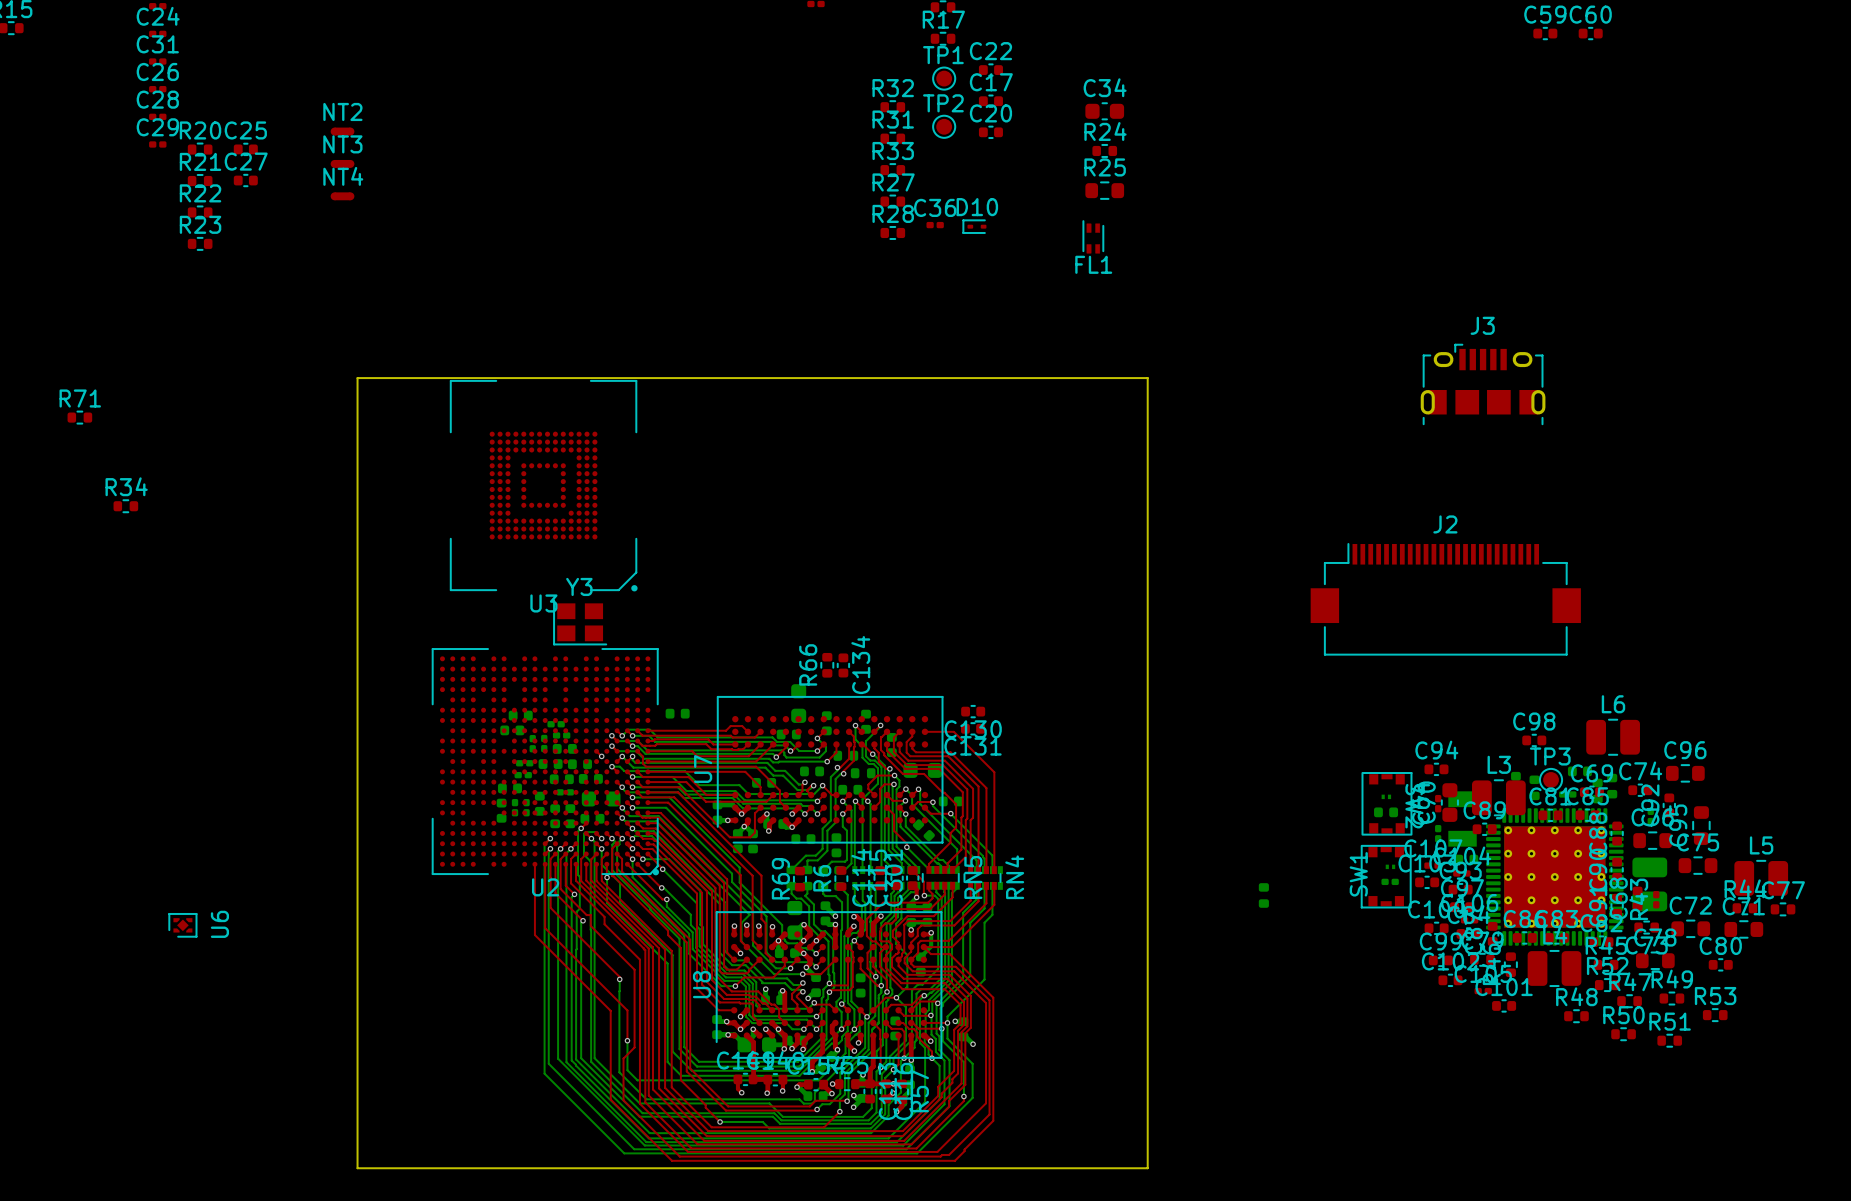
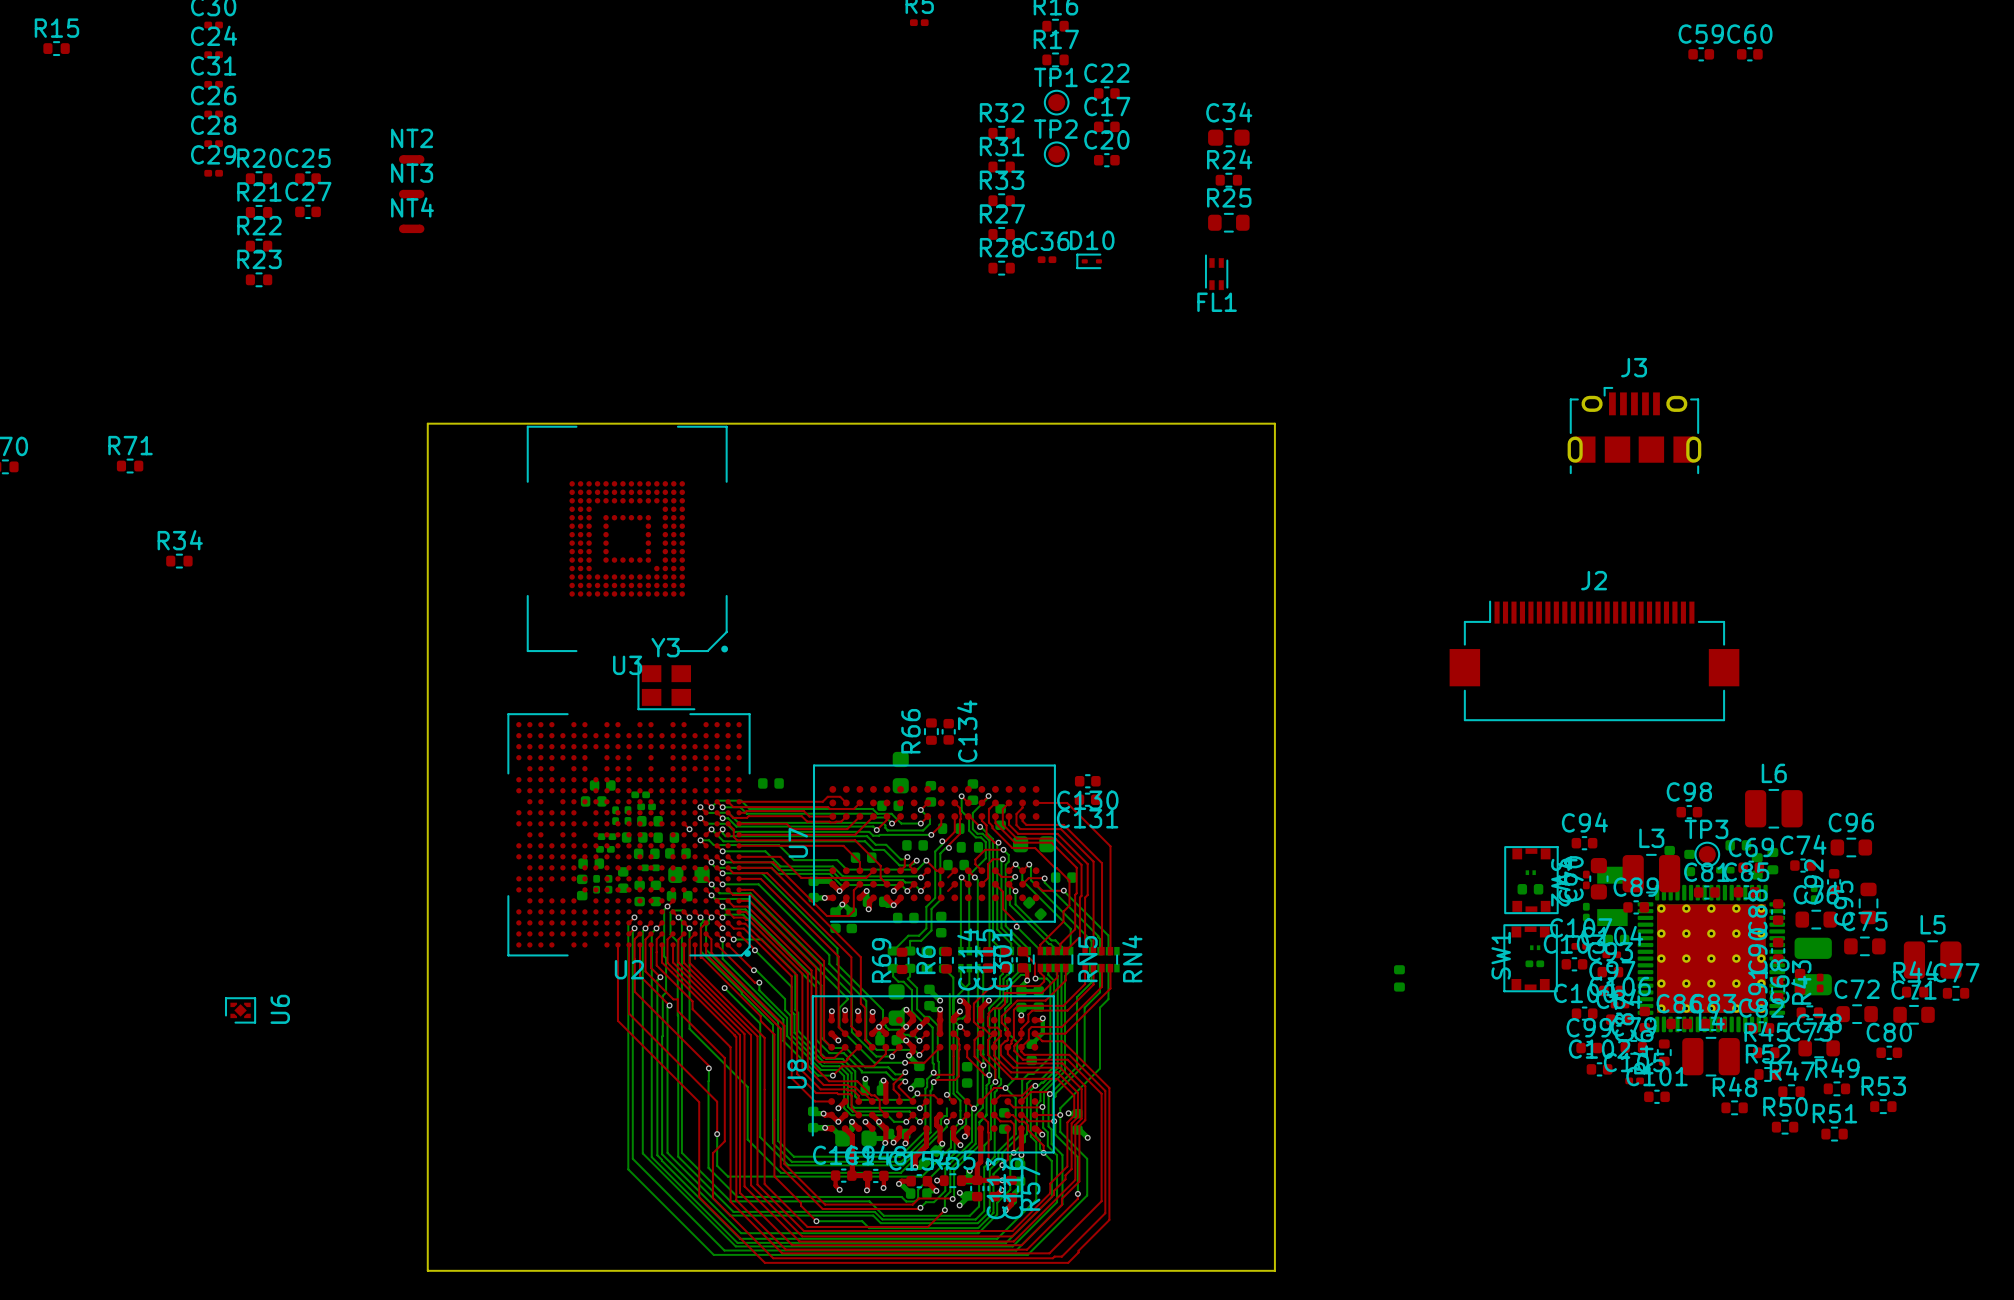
top track: (637, 771) (642, 777) (688, 777) (706, 795) (735, 795) -> none
bottom track: (842, 801) (851, 810) (851, 863) (844, 870) (839, 870) -> none
via: (842, 801) -> none
bottom track: (842, 814) (842, 826) (846, 830) (846, 859) (845, 861) (831, 861) (823, 870) -> none
via: (842, 814) -> none
bottom track: (601, 864) (620, 882) (620, 902) (672, 955) (672, 1051) (691, 1070) (799, 1070) (841, 1029) (841, 1011) (836, 1006) (836, 1001) (841, 997) (842, 902) (835, 896) (825, 896) (823, 893) (823, 886) -> (689, 945) (689, 1028) (747, 1086) (747, 1139) (781, 1172) (900, 1172) (946, 1126) (946, 1121)
bottom track: (607, 877) (607, 903) (667, 963) -> (724, 988) (760, 1023) (760, 1051)
via position: (607, 877) -> (724, 988)
bottom track: (862, 900) (865, 903) (865, 929) (854, 940) -> (969, 983) (953, 999) (953, 1020) (960, 1026)
bottom track: (844, 1001) (841, 1004) (847, 1010) (847, 1031) (838, 1043) (831, 1043) (799, 1075) (681, 1075) (667, 1062) (667, 1043) -> (946, 1108) (946, 1116) (941, 1119) (941, 1127) (903, 1165) (788, 1165) (760, 1137)

